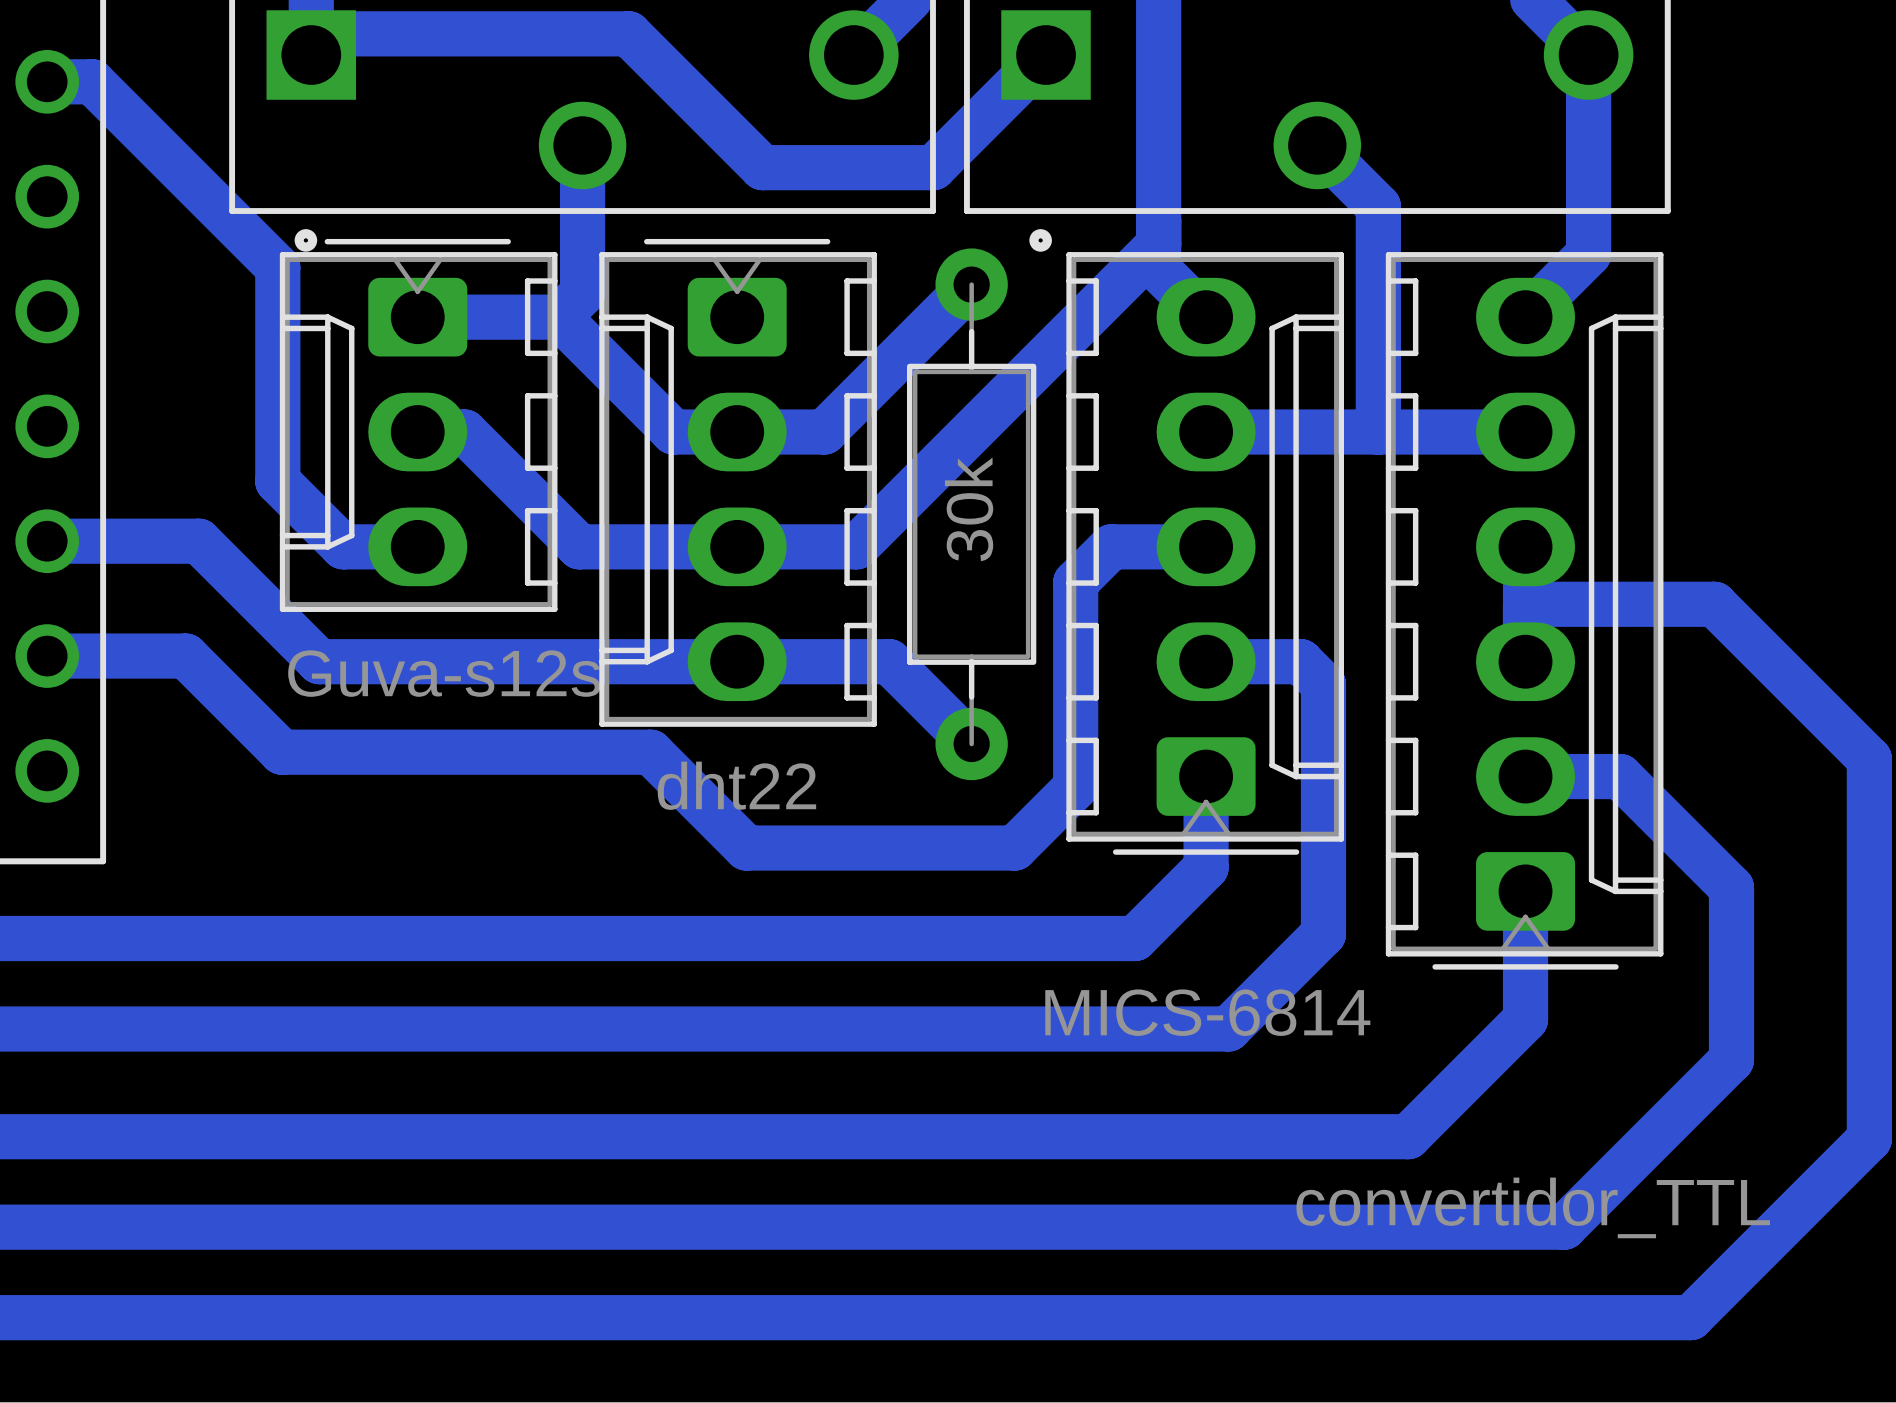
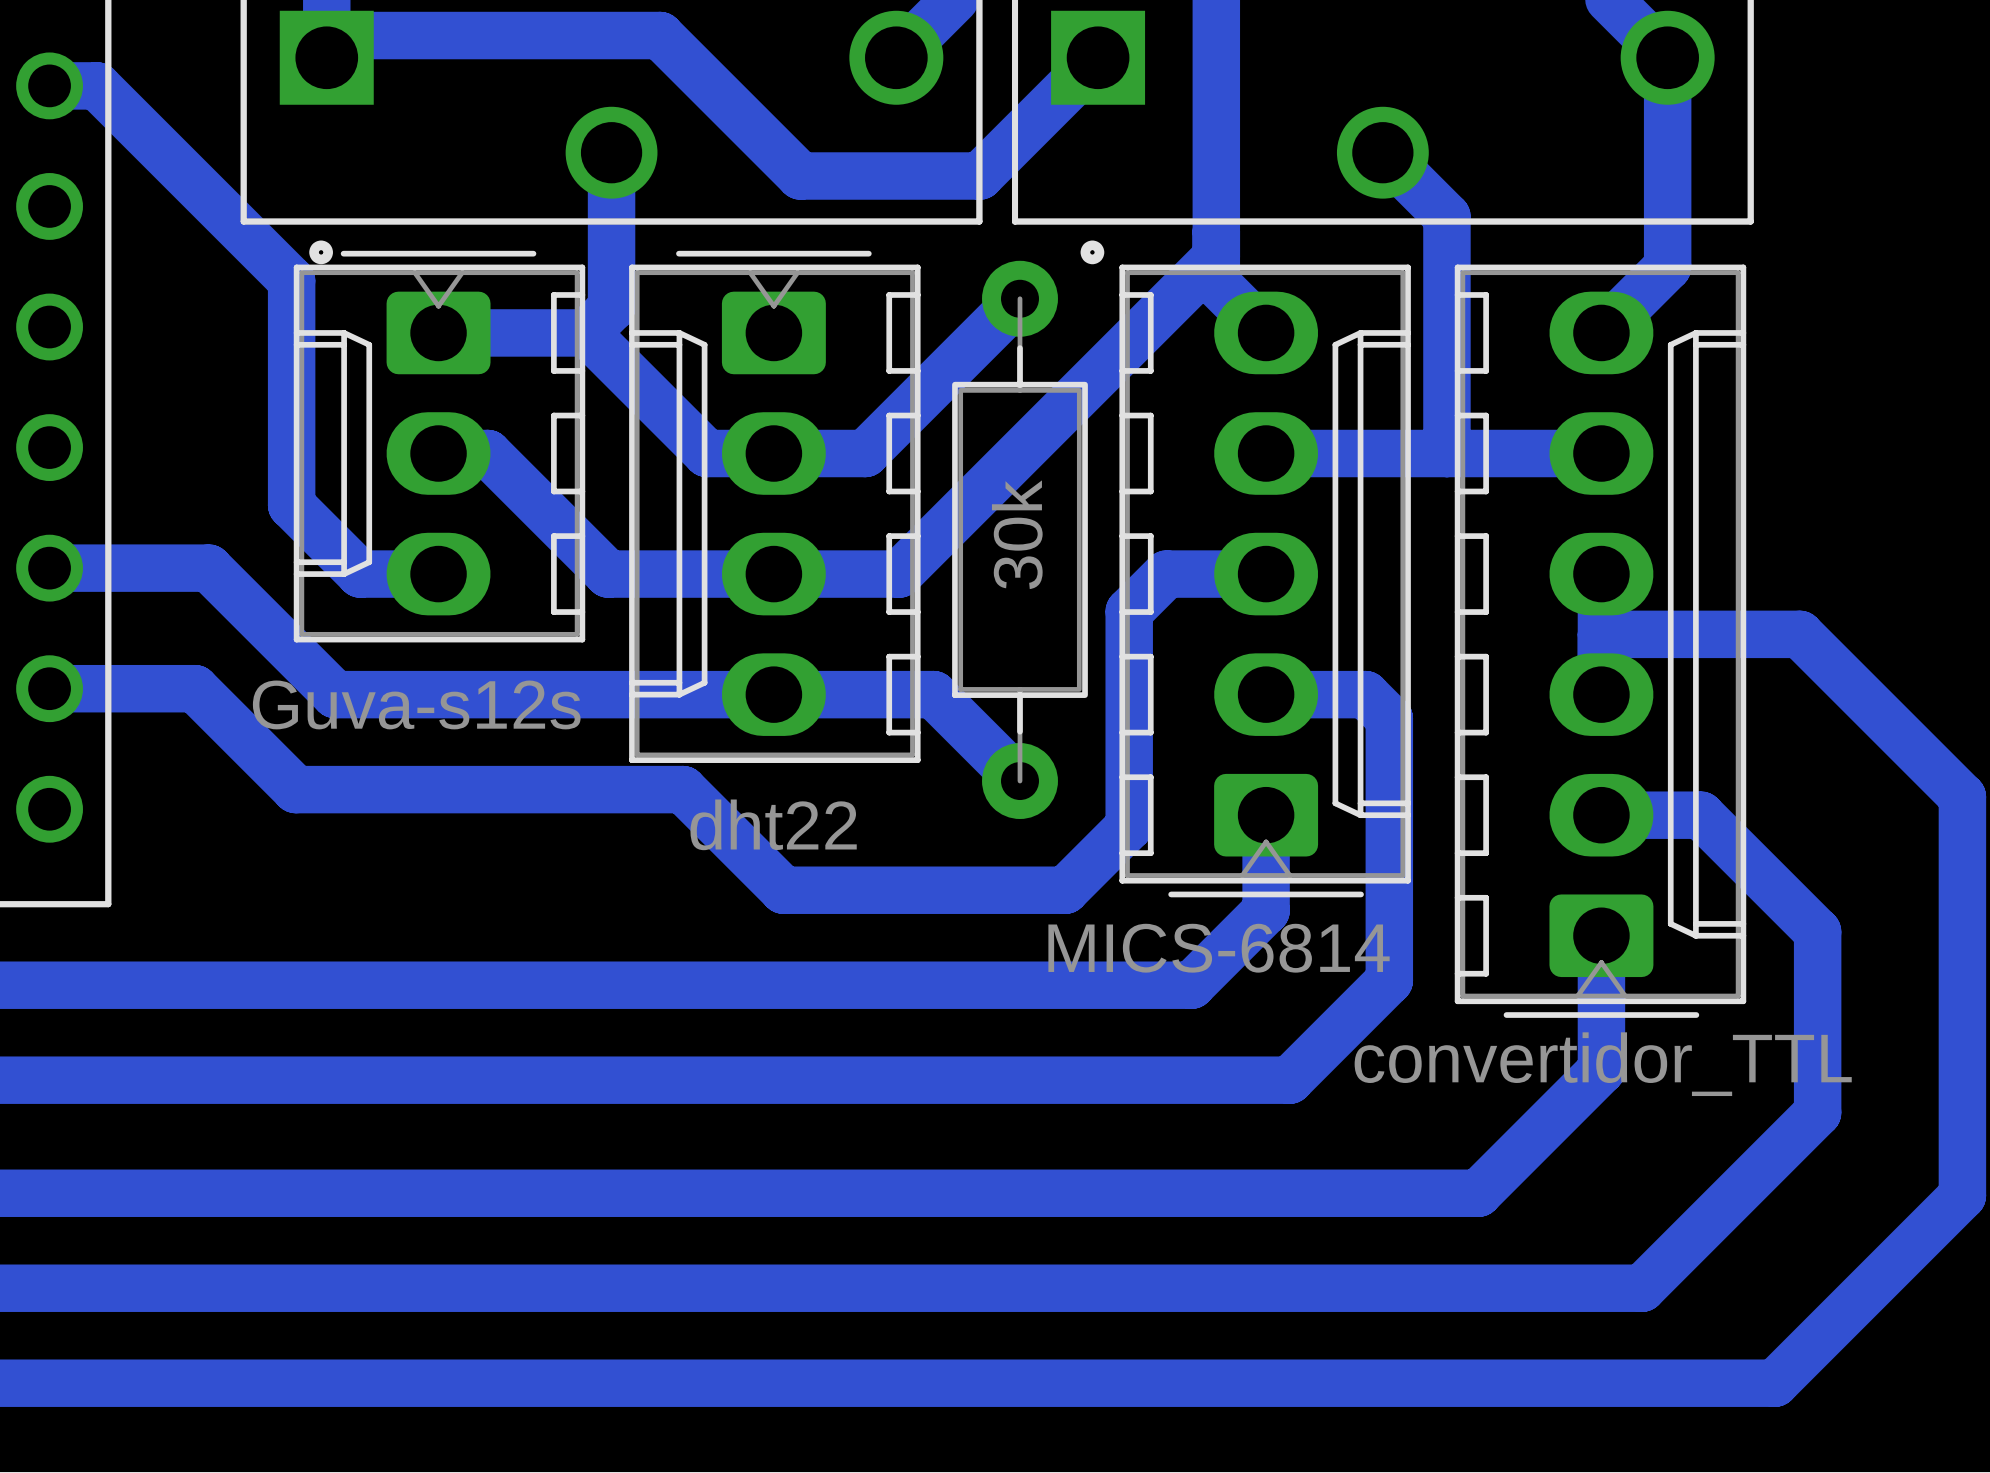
part value position: Guva-s12s (444, 673) -> Guva-s12s (416, 704)
part value position: MICS-6814 (1207, 1012) -> MICS-6814 (1219, 948)
part value position: convertidor_TTL (1533, 1207) -> convertidor_TTL (1603, 1064)

